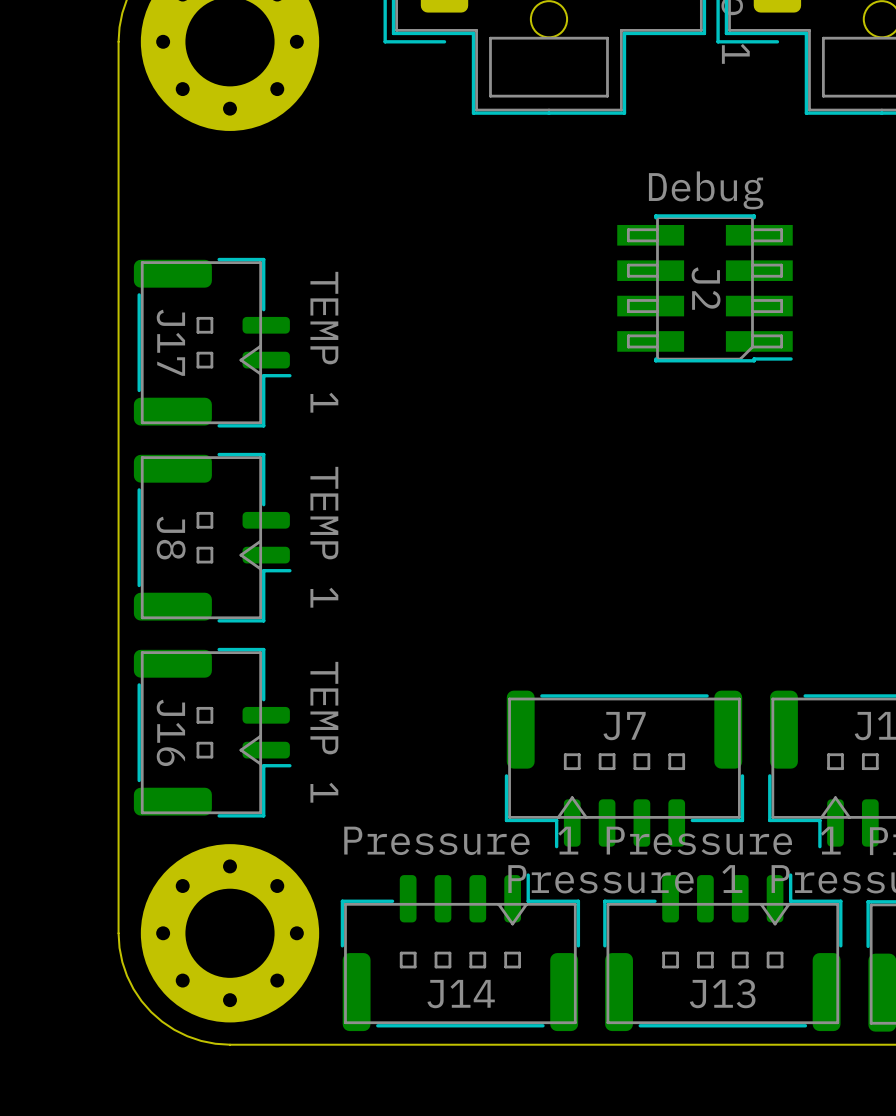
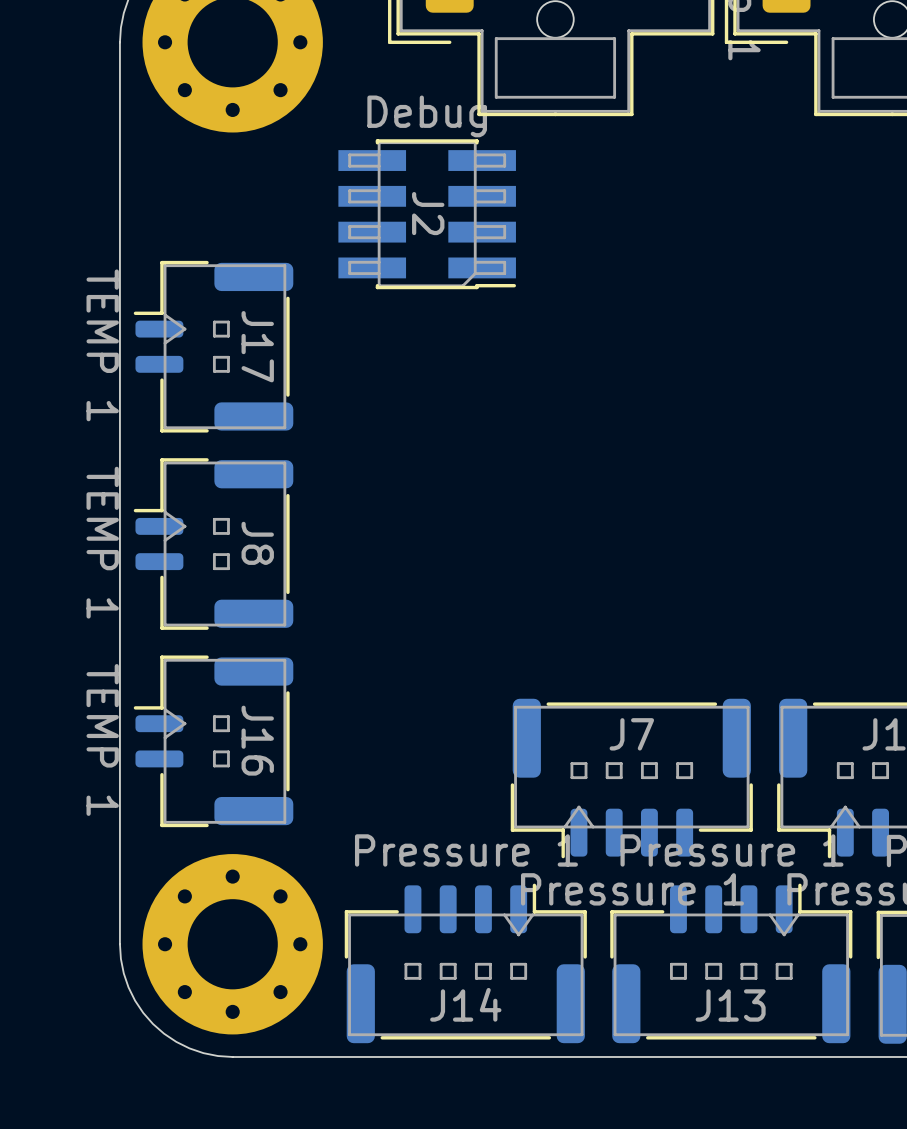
J2 position: (704, 288) -> (427, 214)
J17 rotation: 0° (212, 342) -> 180° (213, 346)
J8 rotation: 0° (212, 537) -> 180° (213, 544)
J16 rotation: 0° (212, 732) -> 180° (213, 741)

